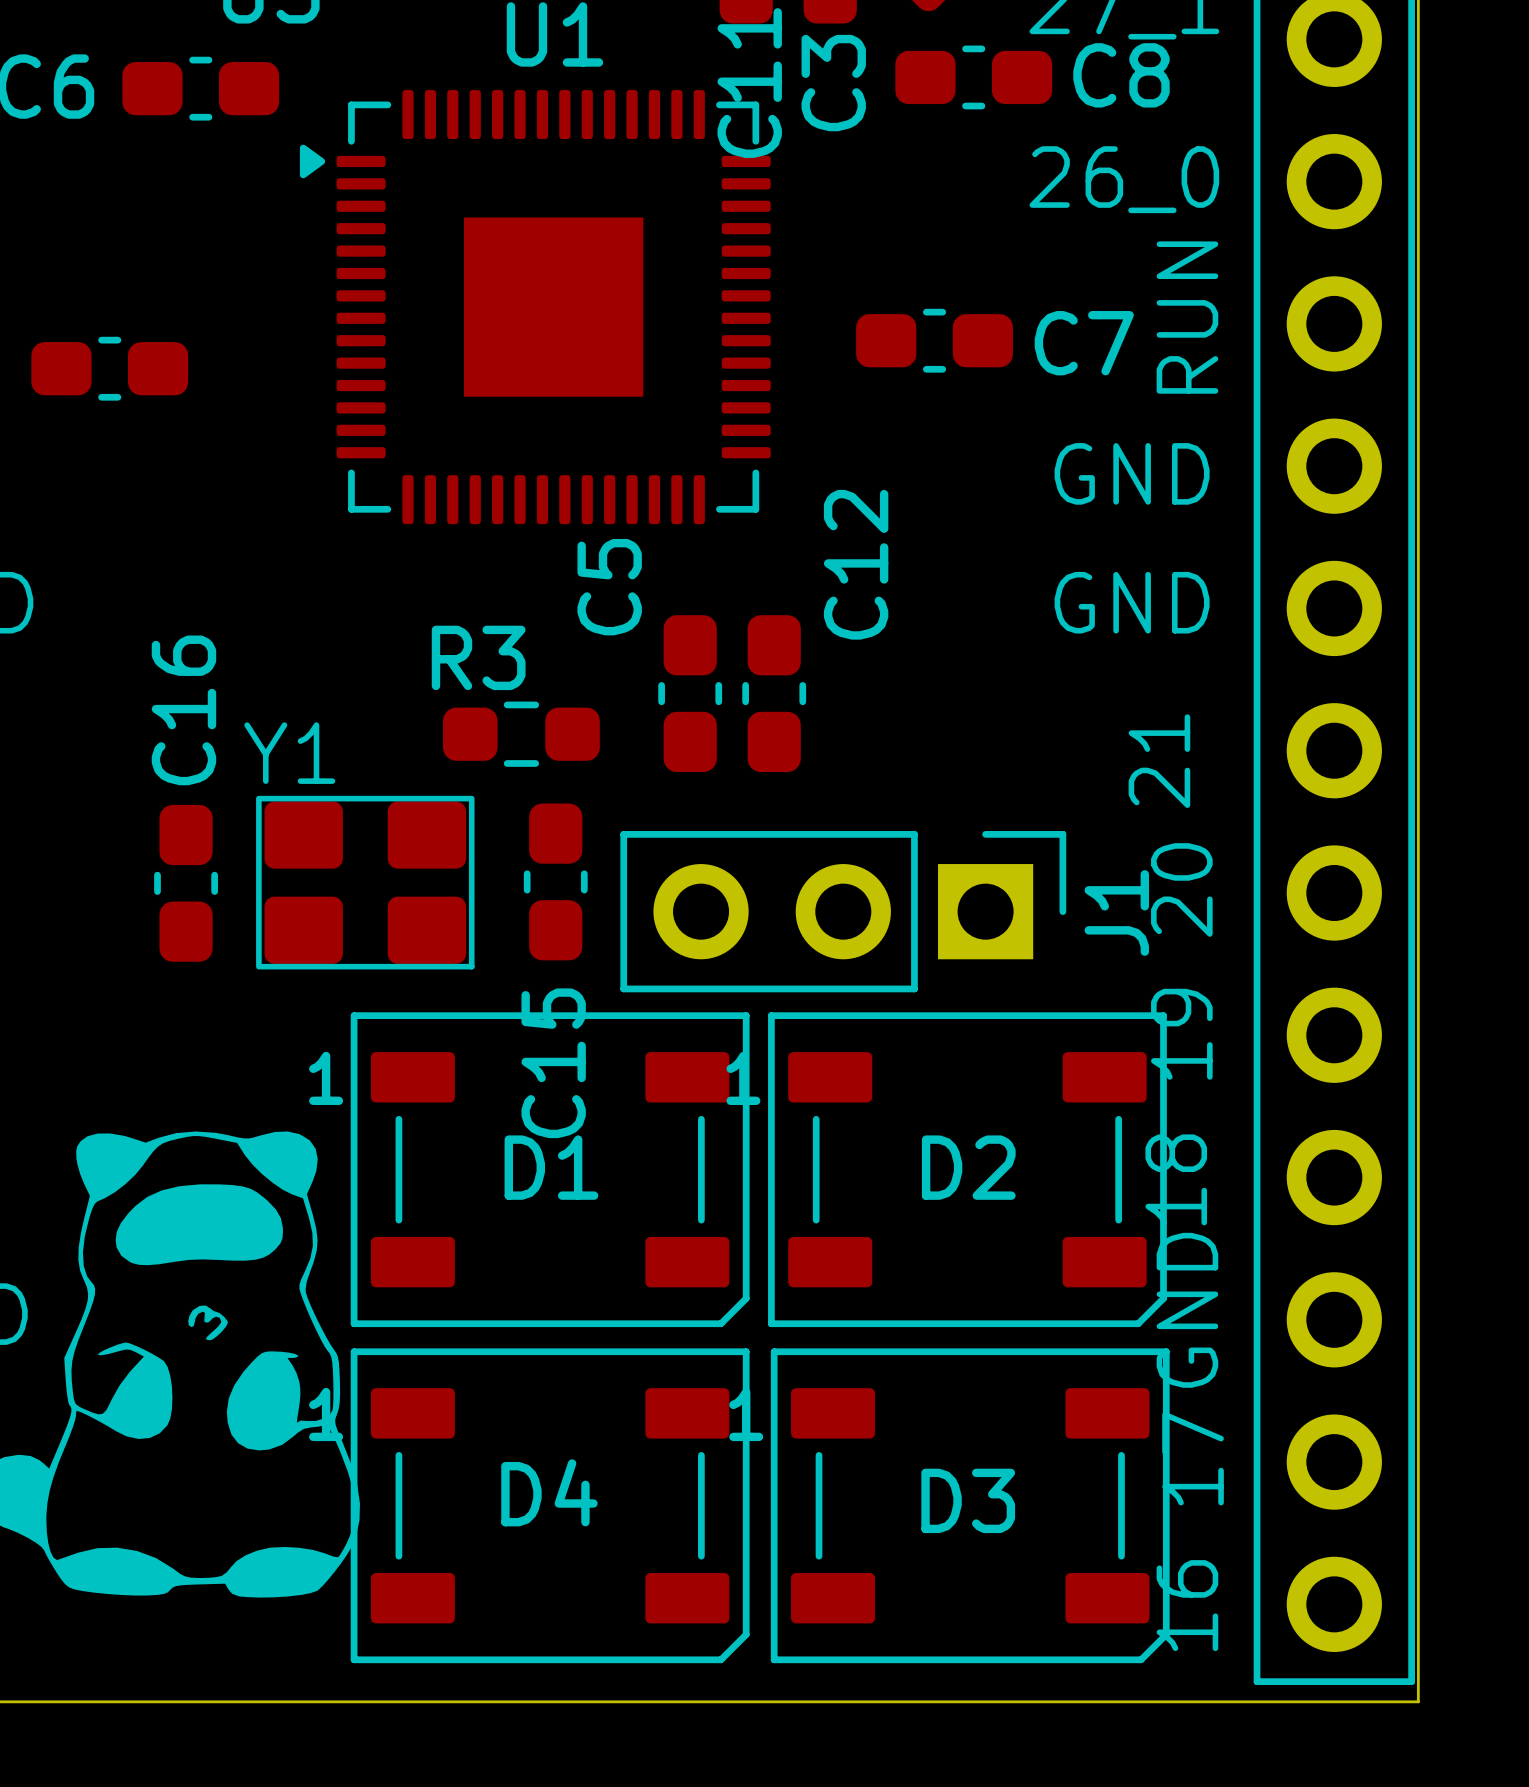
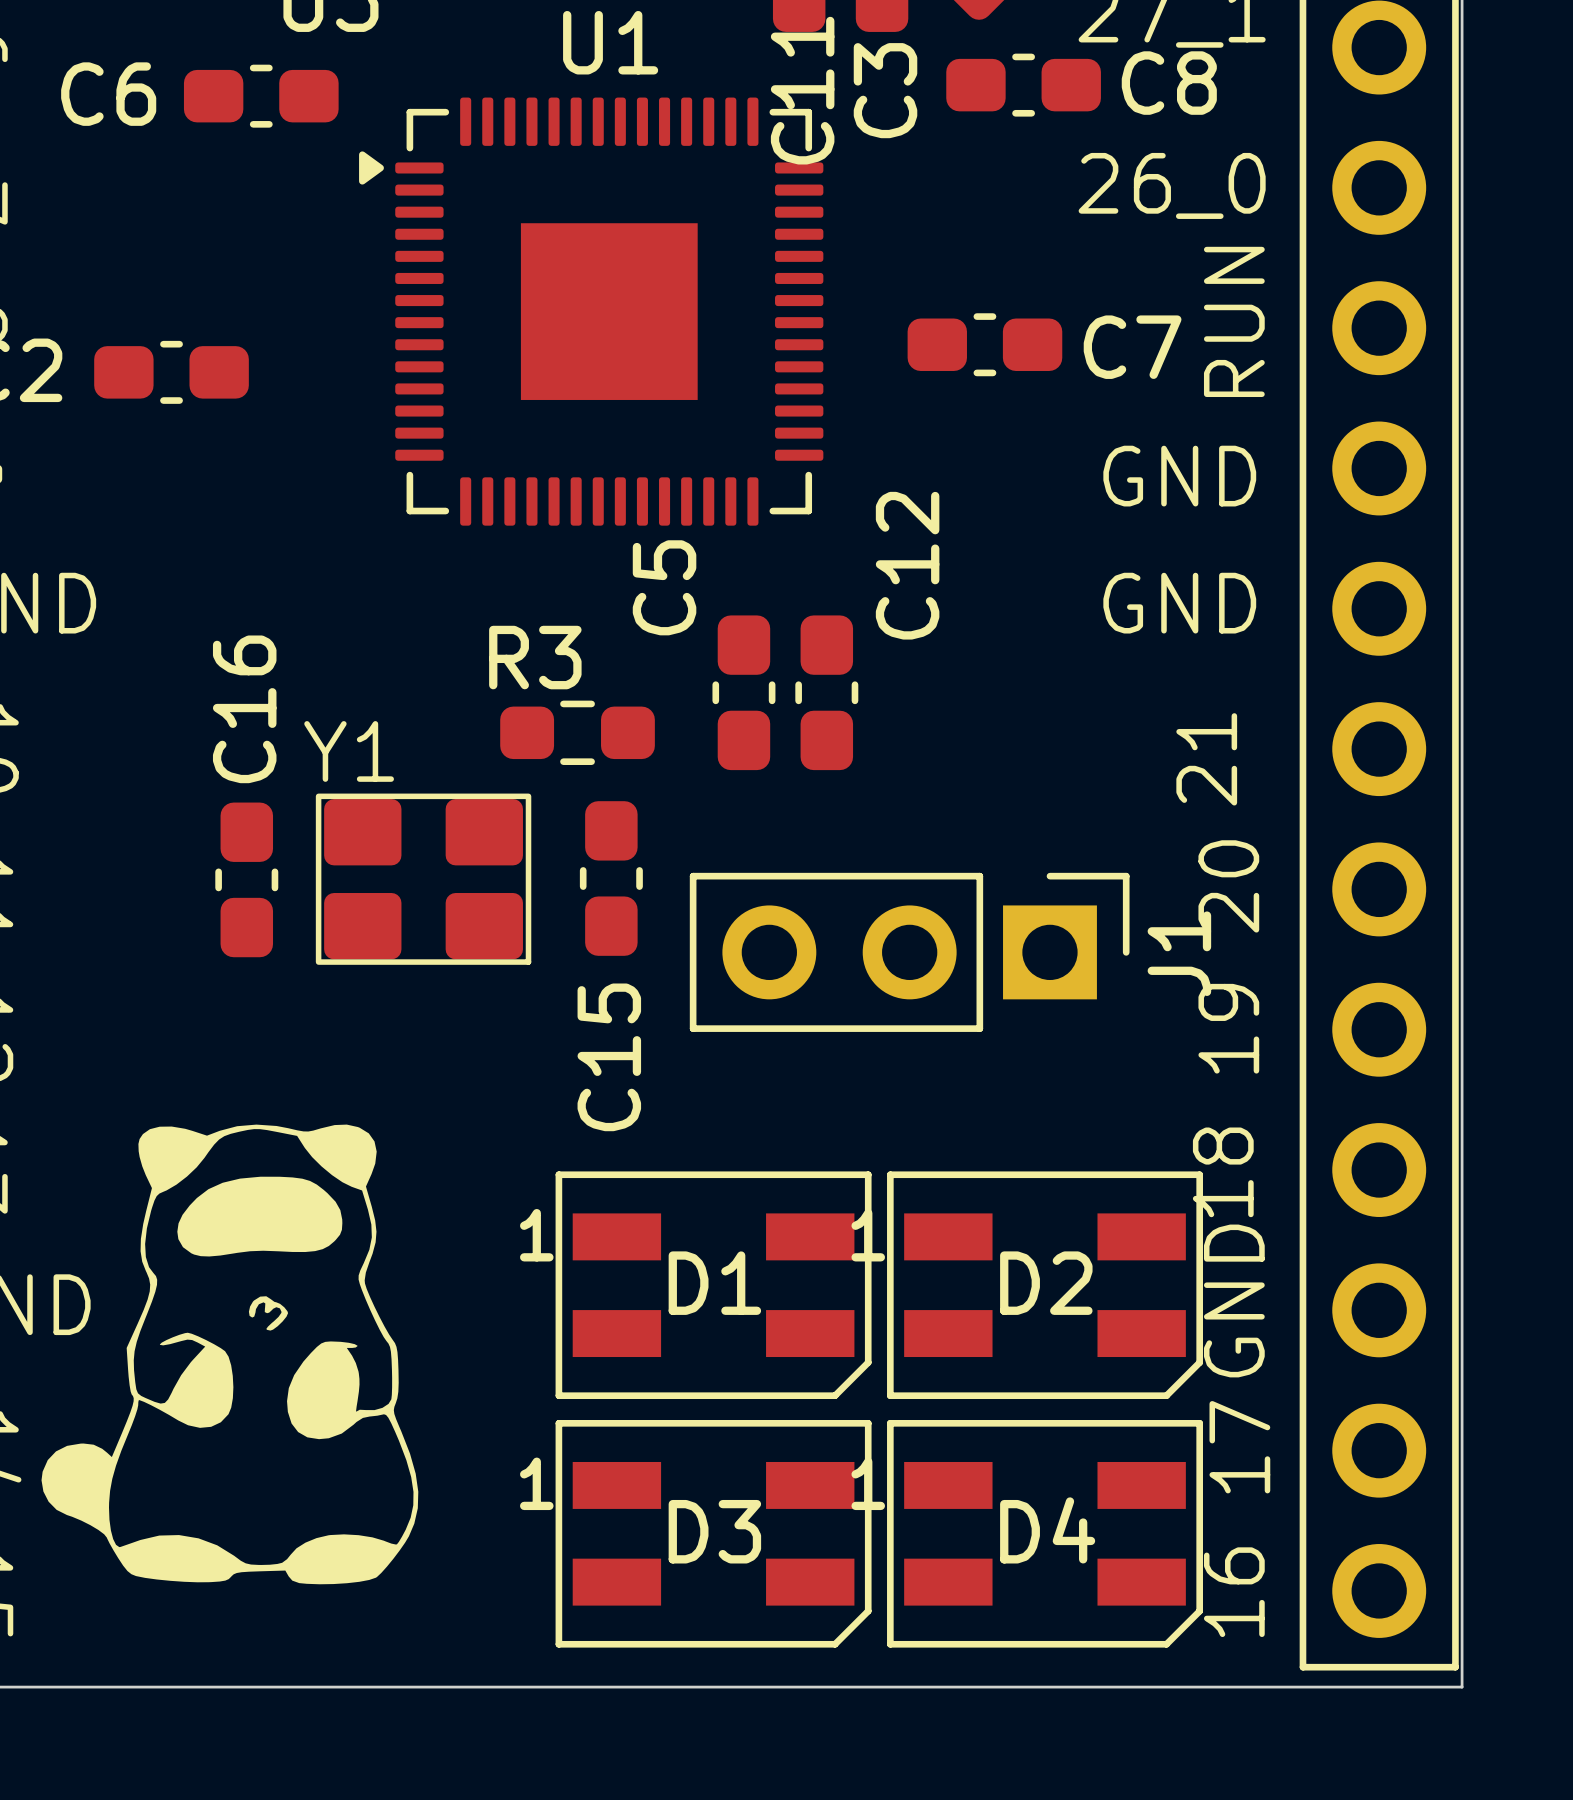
J1 position: (843, 911) -> (909, 952)
D1 footprint: [350, 1012, 750, 1328] -> [555, 1171, 872, 1400]
D2 footprint: [768, 1012, 1167, 1328] -> [887, 1171, 1203, 1400]
D4 footprint: [350, 1348, 750, 1664] -> [887, 1420, 1203, 1648]
D3 footprint: [770, 1348, 1170, 1664] -> [555, 1420, 872, 1648]

